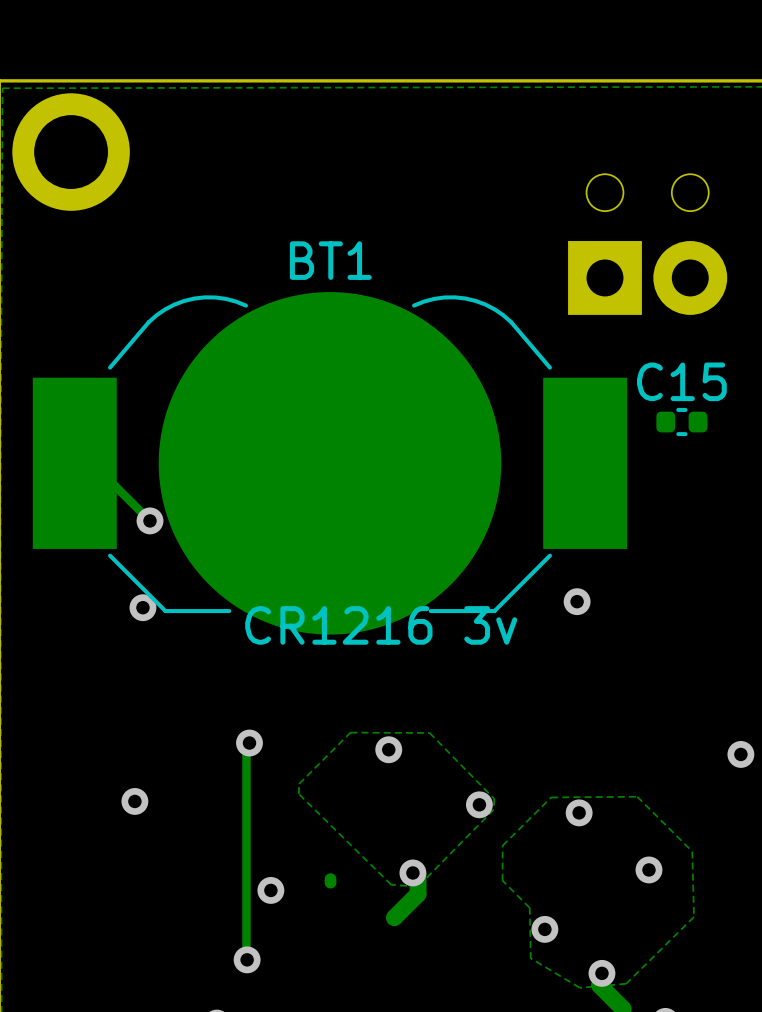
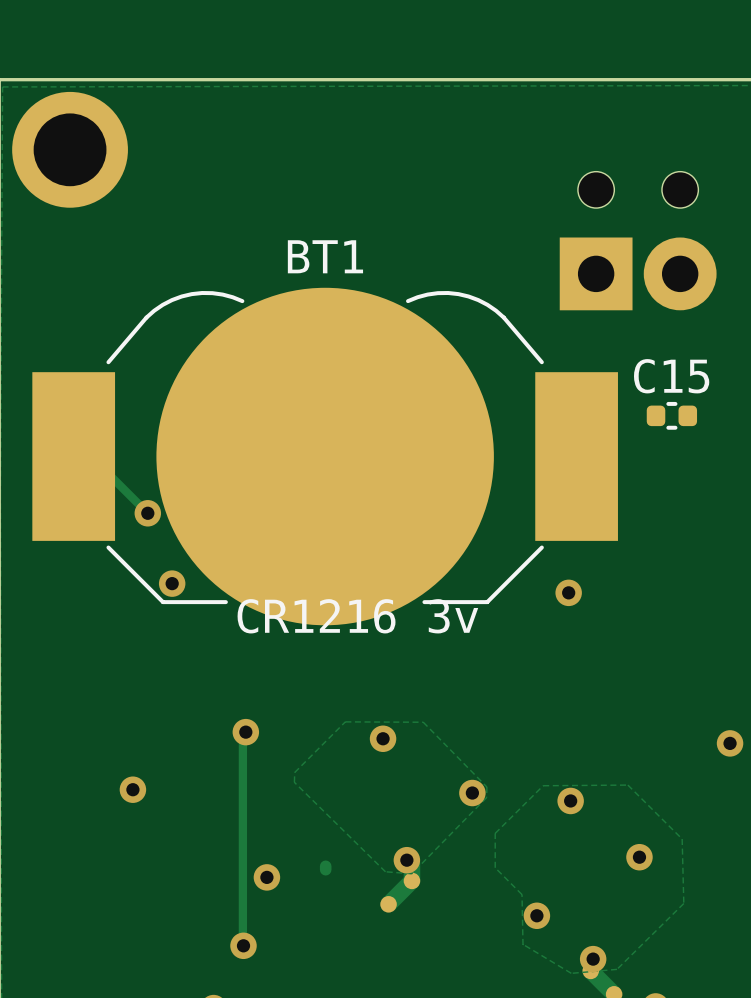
via position: (142, 607) -> (172, 583)

